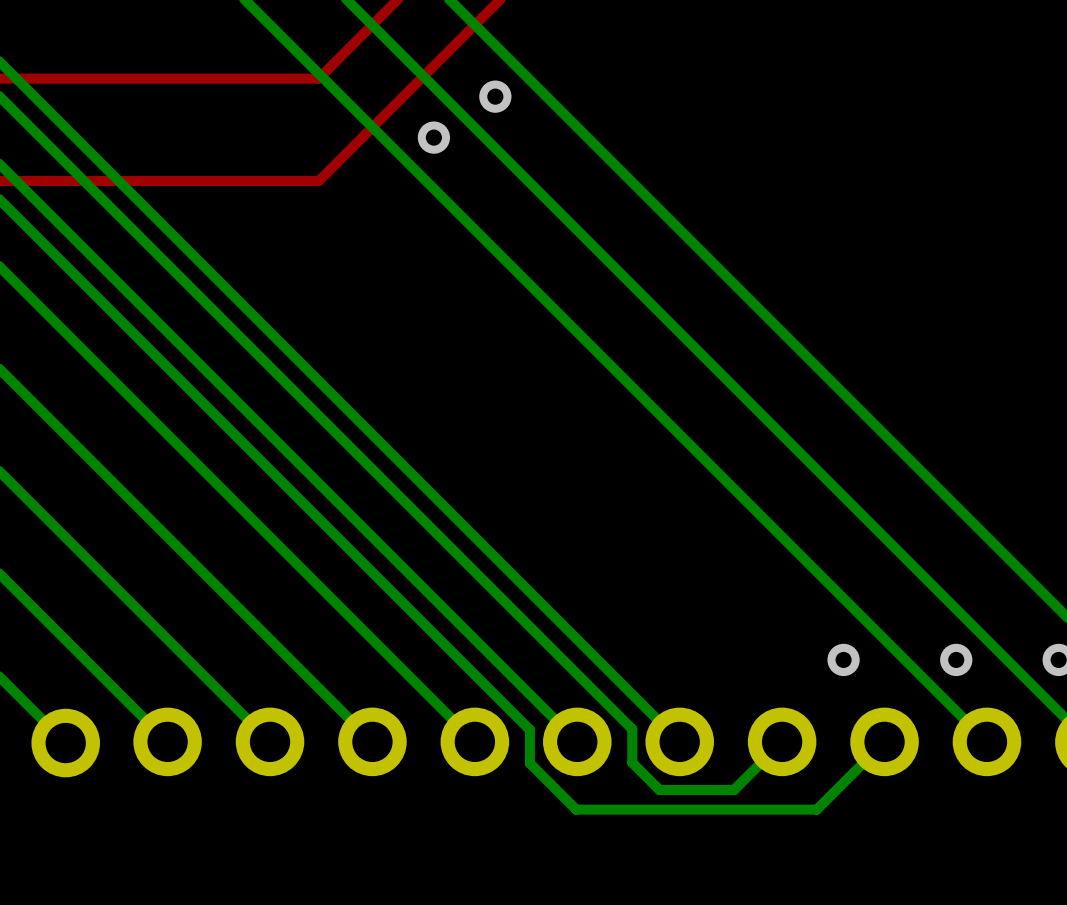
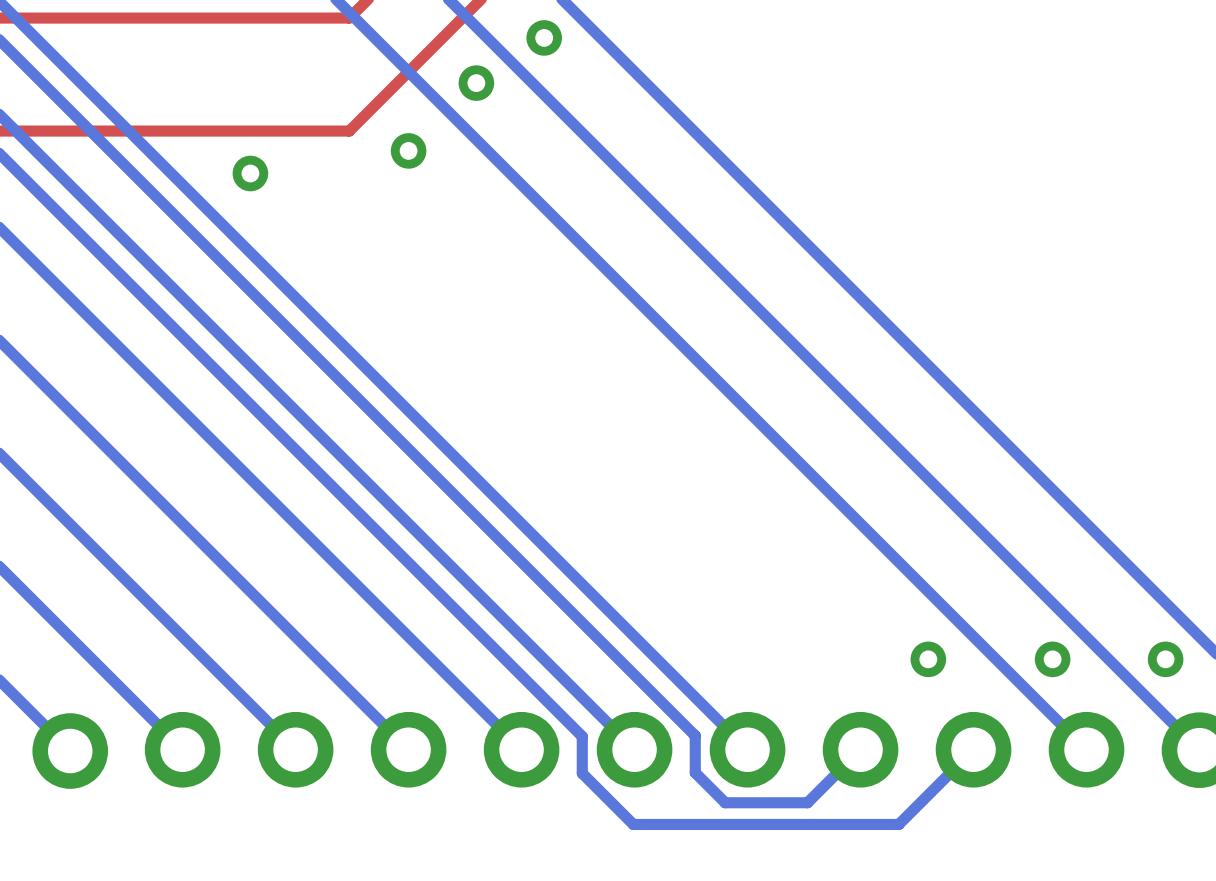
via: none -> (408, 150)
via: none -> (250, 173)

